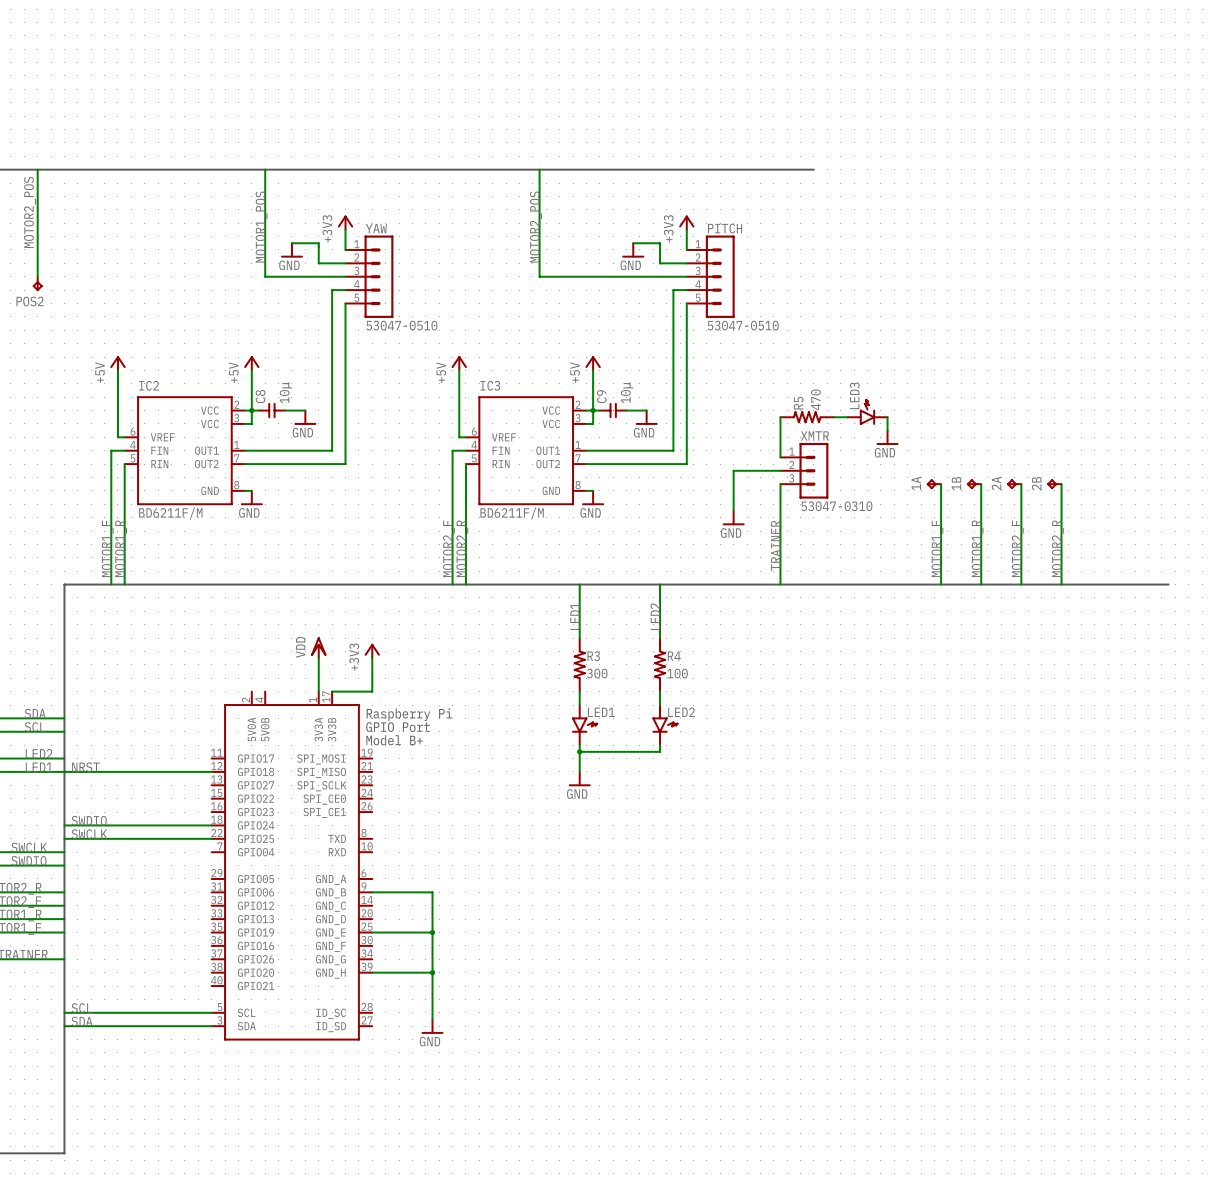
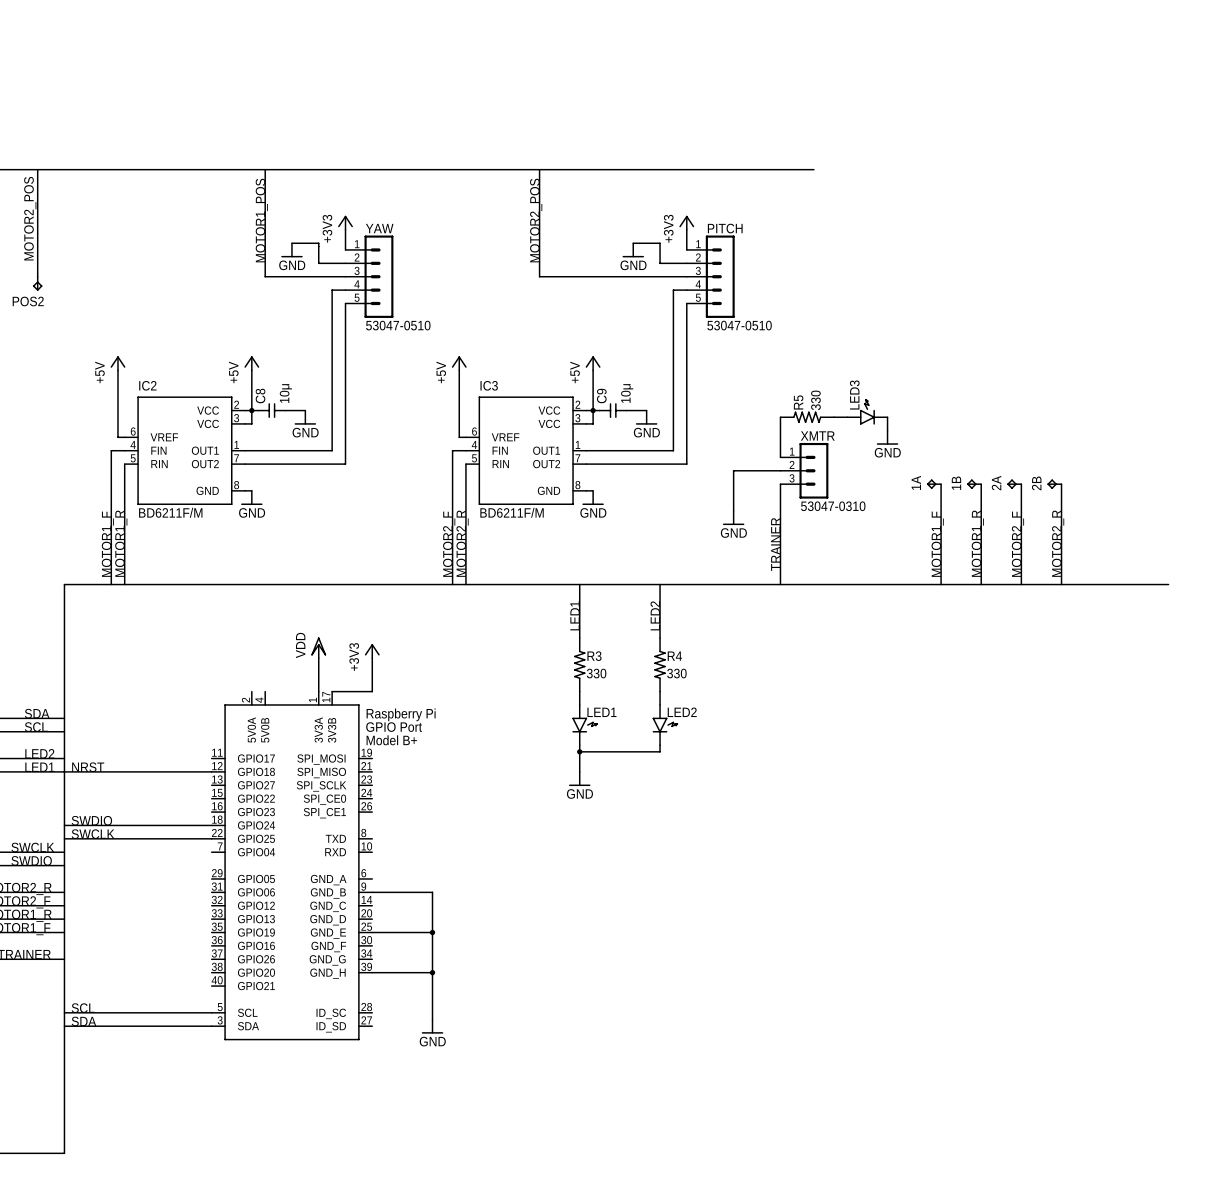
R5 value: 470 (815, 399) -> 330 (815, 400)
R3 value: 300 (597, 673) -> 330 (596, 673)
R4 value: 100 (677, 673) -> 330 (676, 673)

